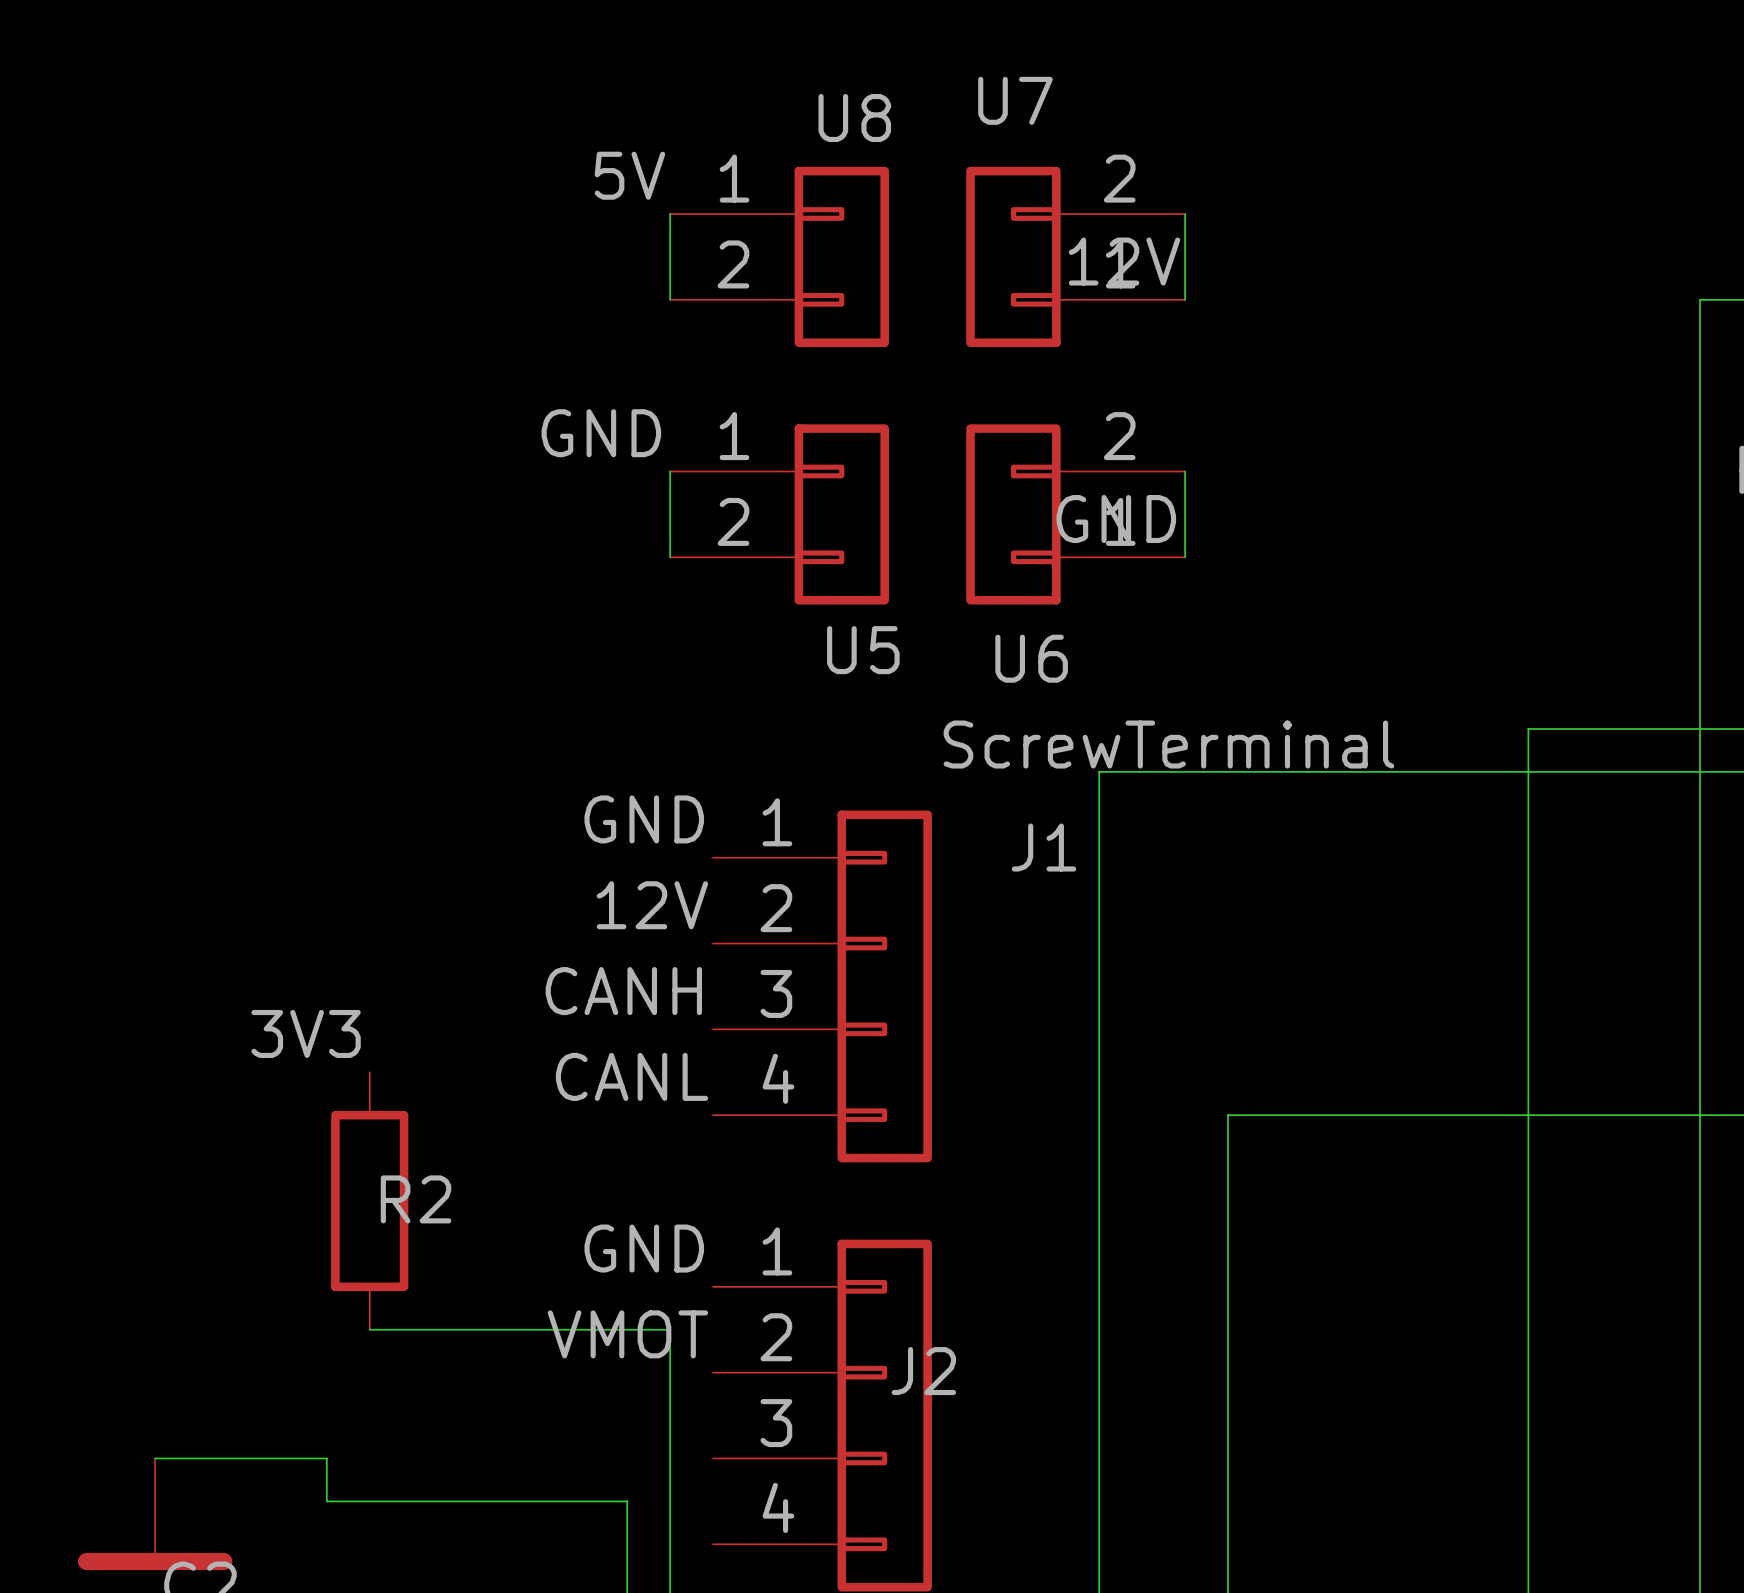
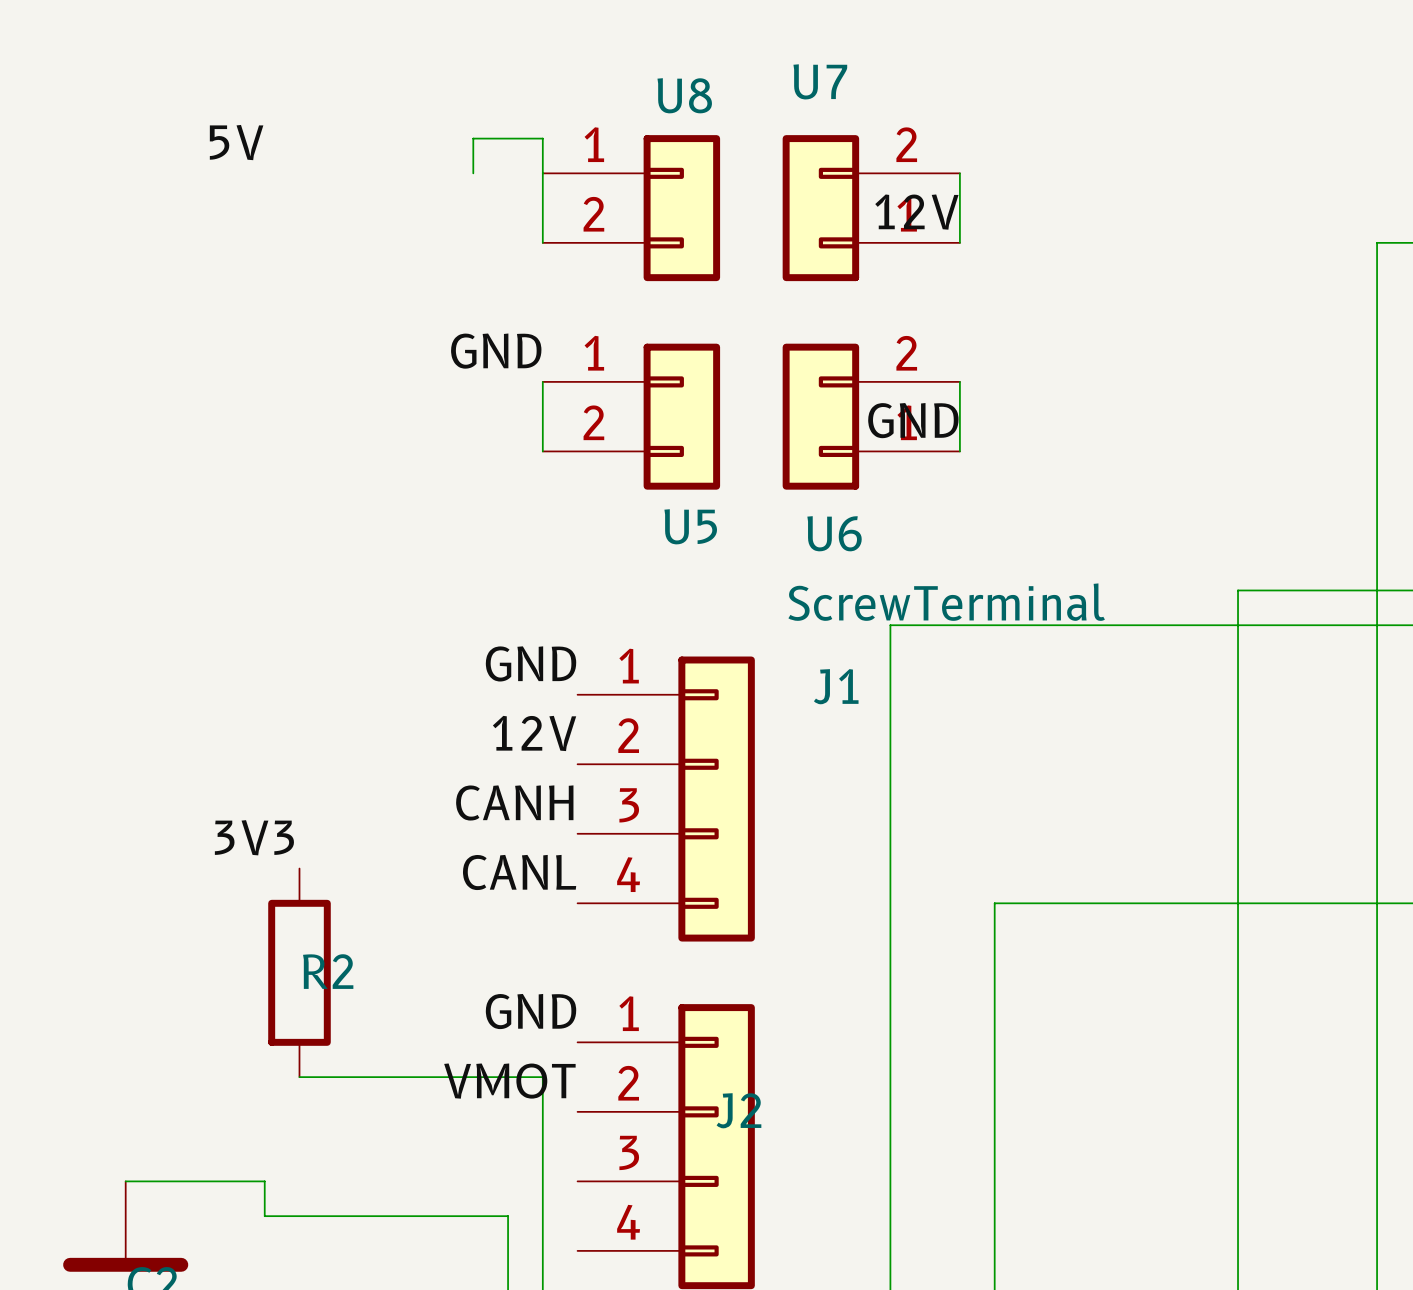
label position: 5V (629, 175) -> 5V (236, 142)
wire: none -> (473, 173) (473, 138) (542, 138) (542, 173)

